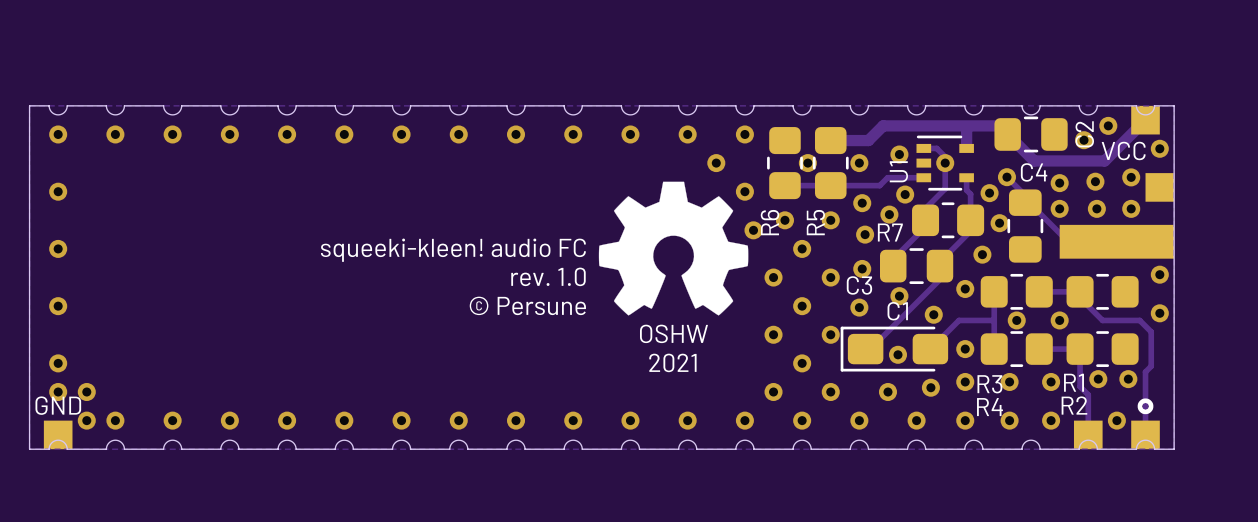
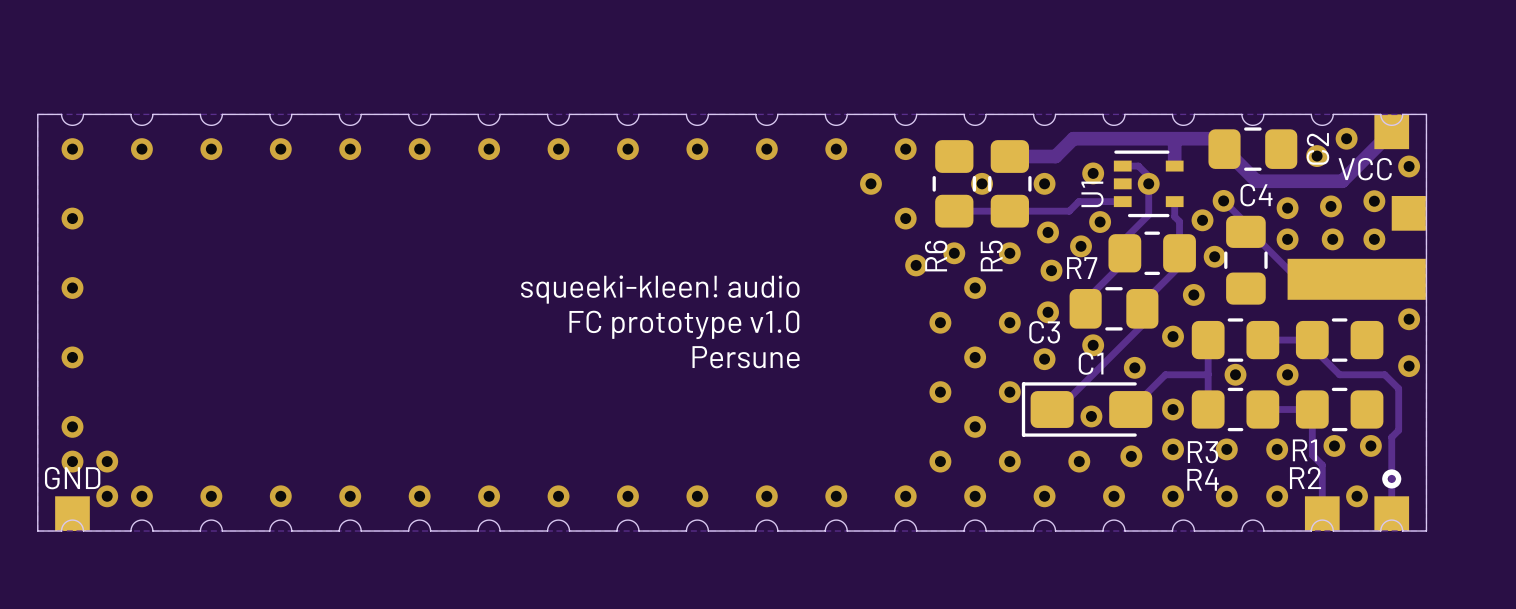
drawing: [598, 181, 749, 316] -> none
text: squeeki-kleen! audio FC (453, 250) -> squeeki-kleen! audio (660, 289)
text: rev. 1.0 (548, 276) -> none
text: none -> FC prototype v1.0 (684, 324)
text: © Persune (527, 305) -> Persune (746, 357)
text: OSHW (673, 333) -> none
text: 2021 (672, 362) -> none

